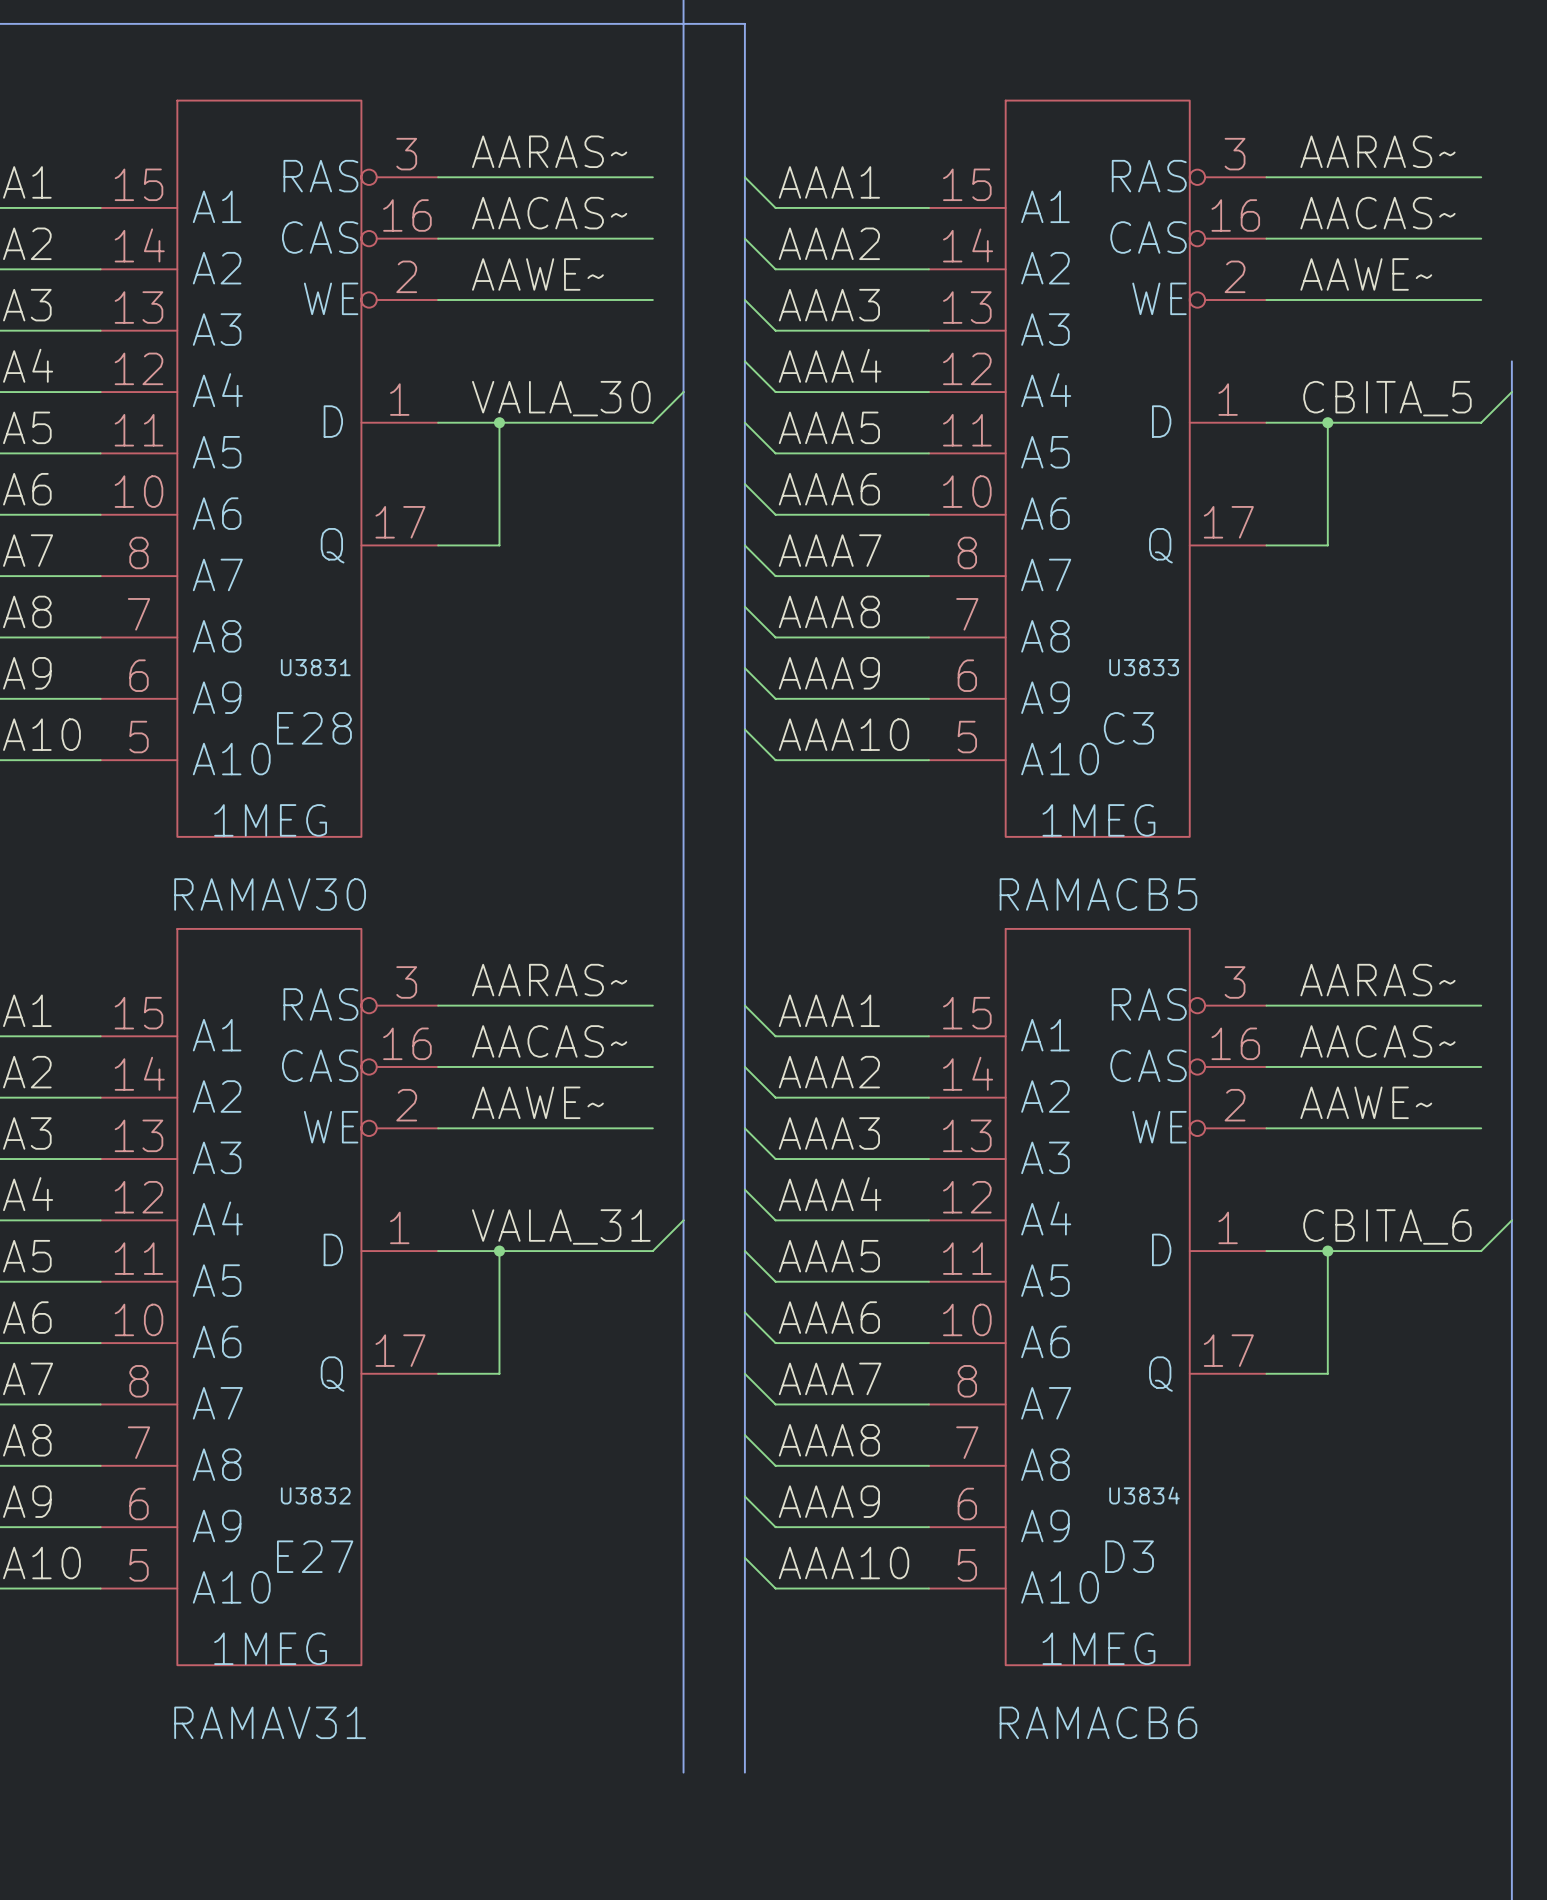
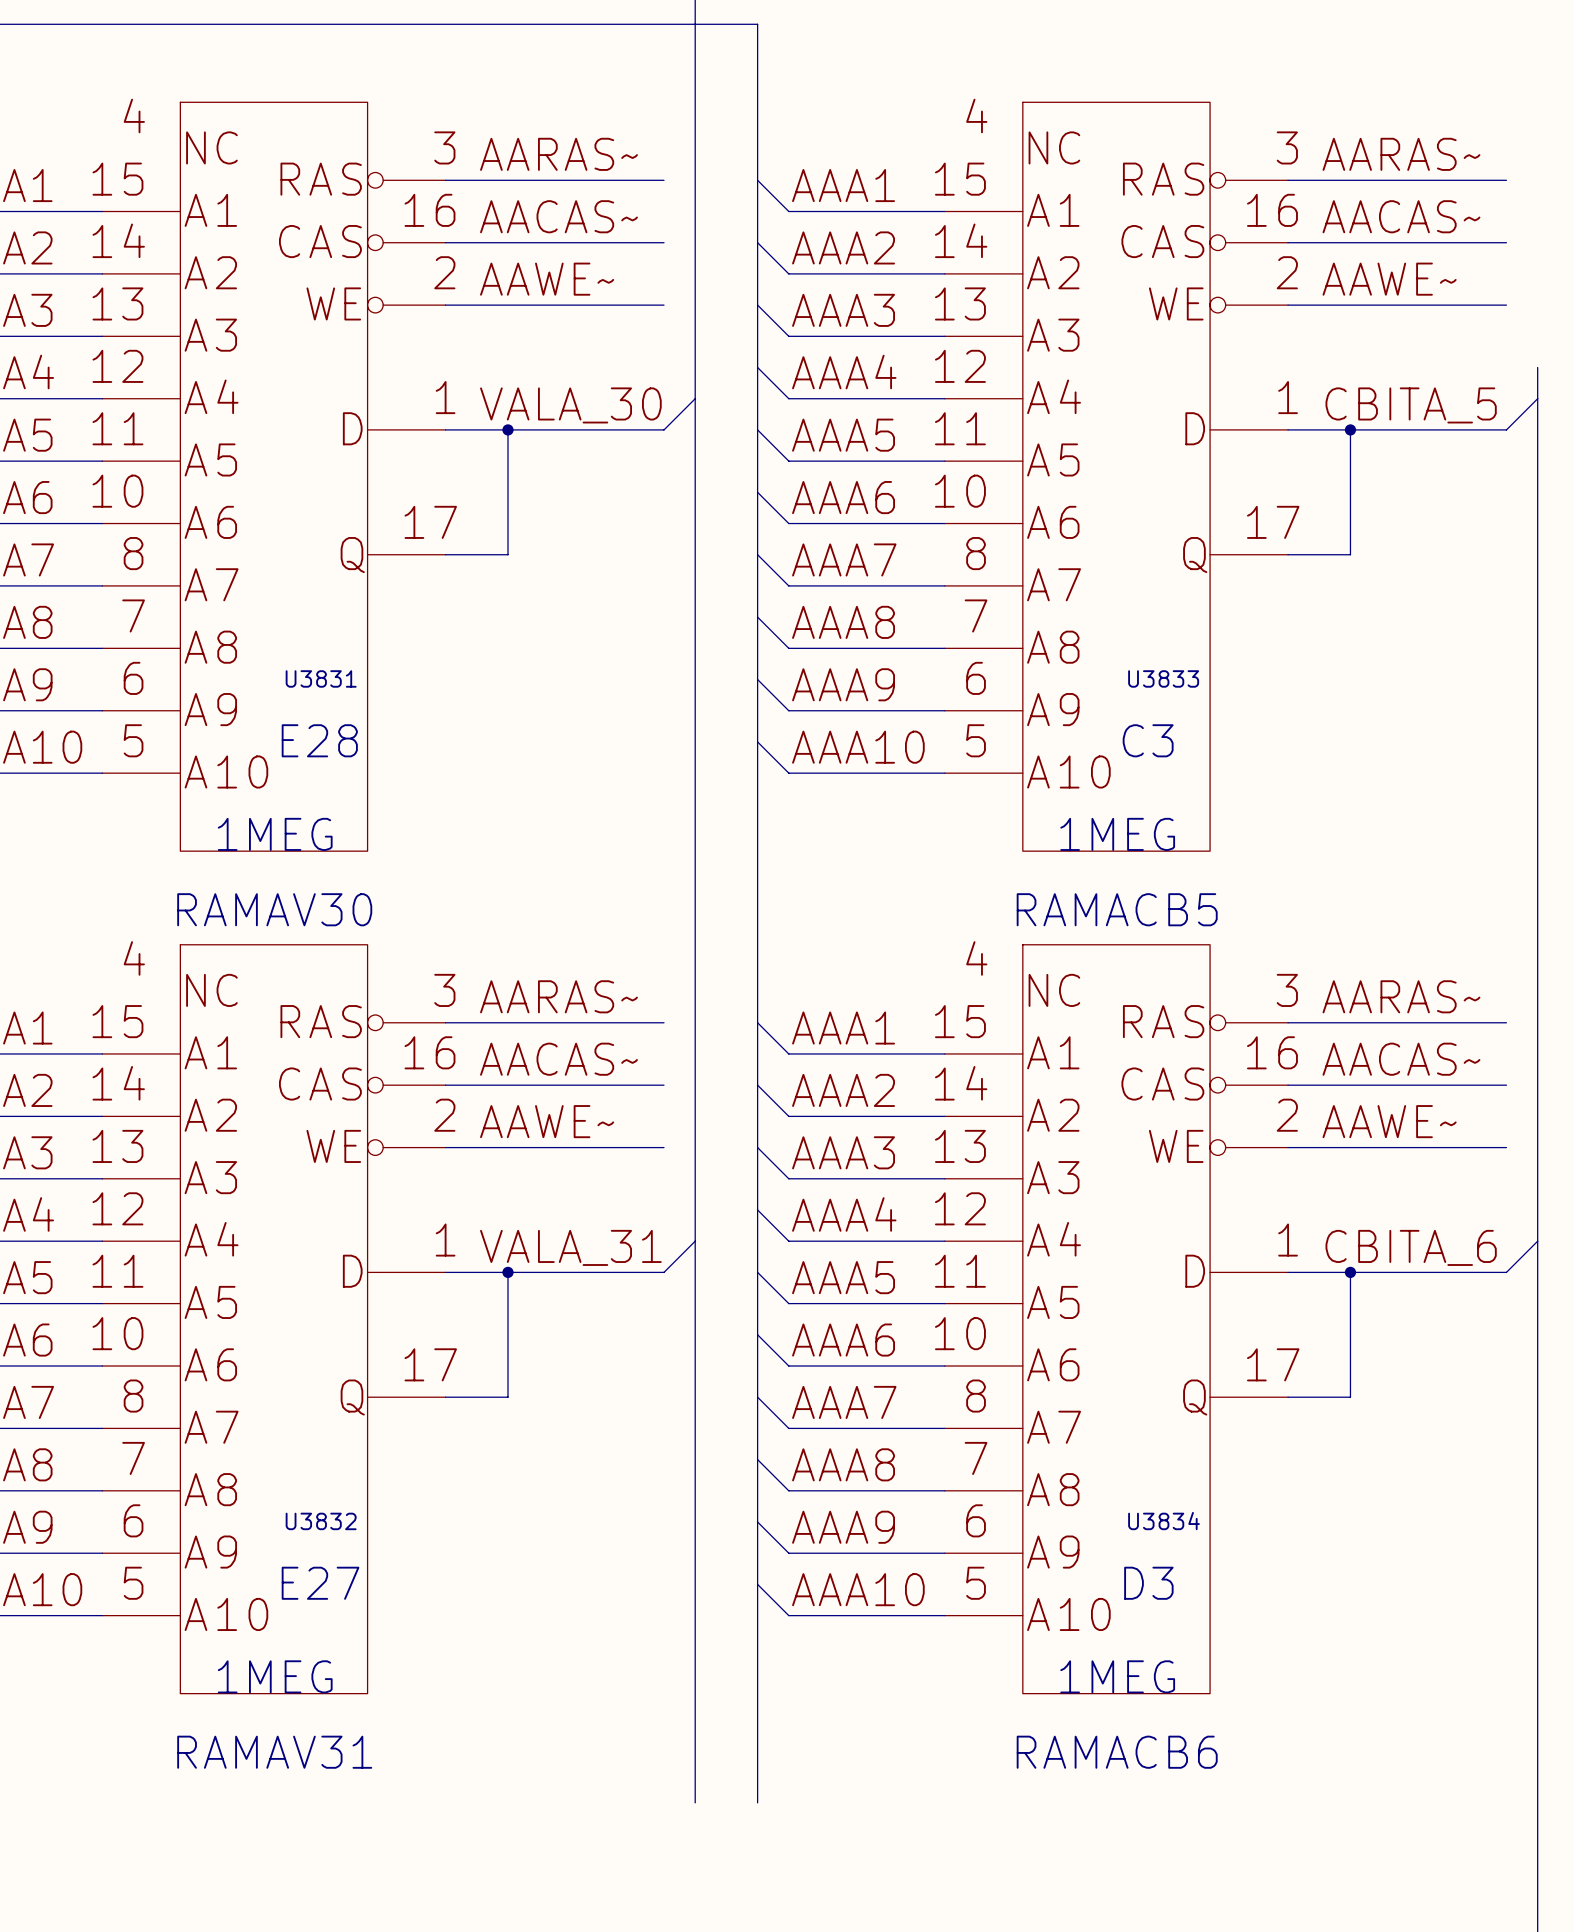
U3831 symbol: [100, 100, 439, 837] -> [102, 102, 446, 852]
U3833 symbol: [928, 100, 1267, 837] -> [944, 102, 1289, 852]
U3832 symbol: [100, 928, 439, 1666] -> [102, 944, 446, 1694]
U3834 symbol: [928, 928, 1267, 1666] -> [944, 944, 1289, 1694]

